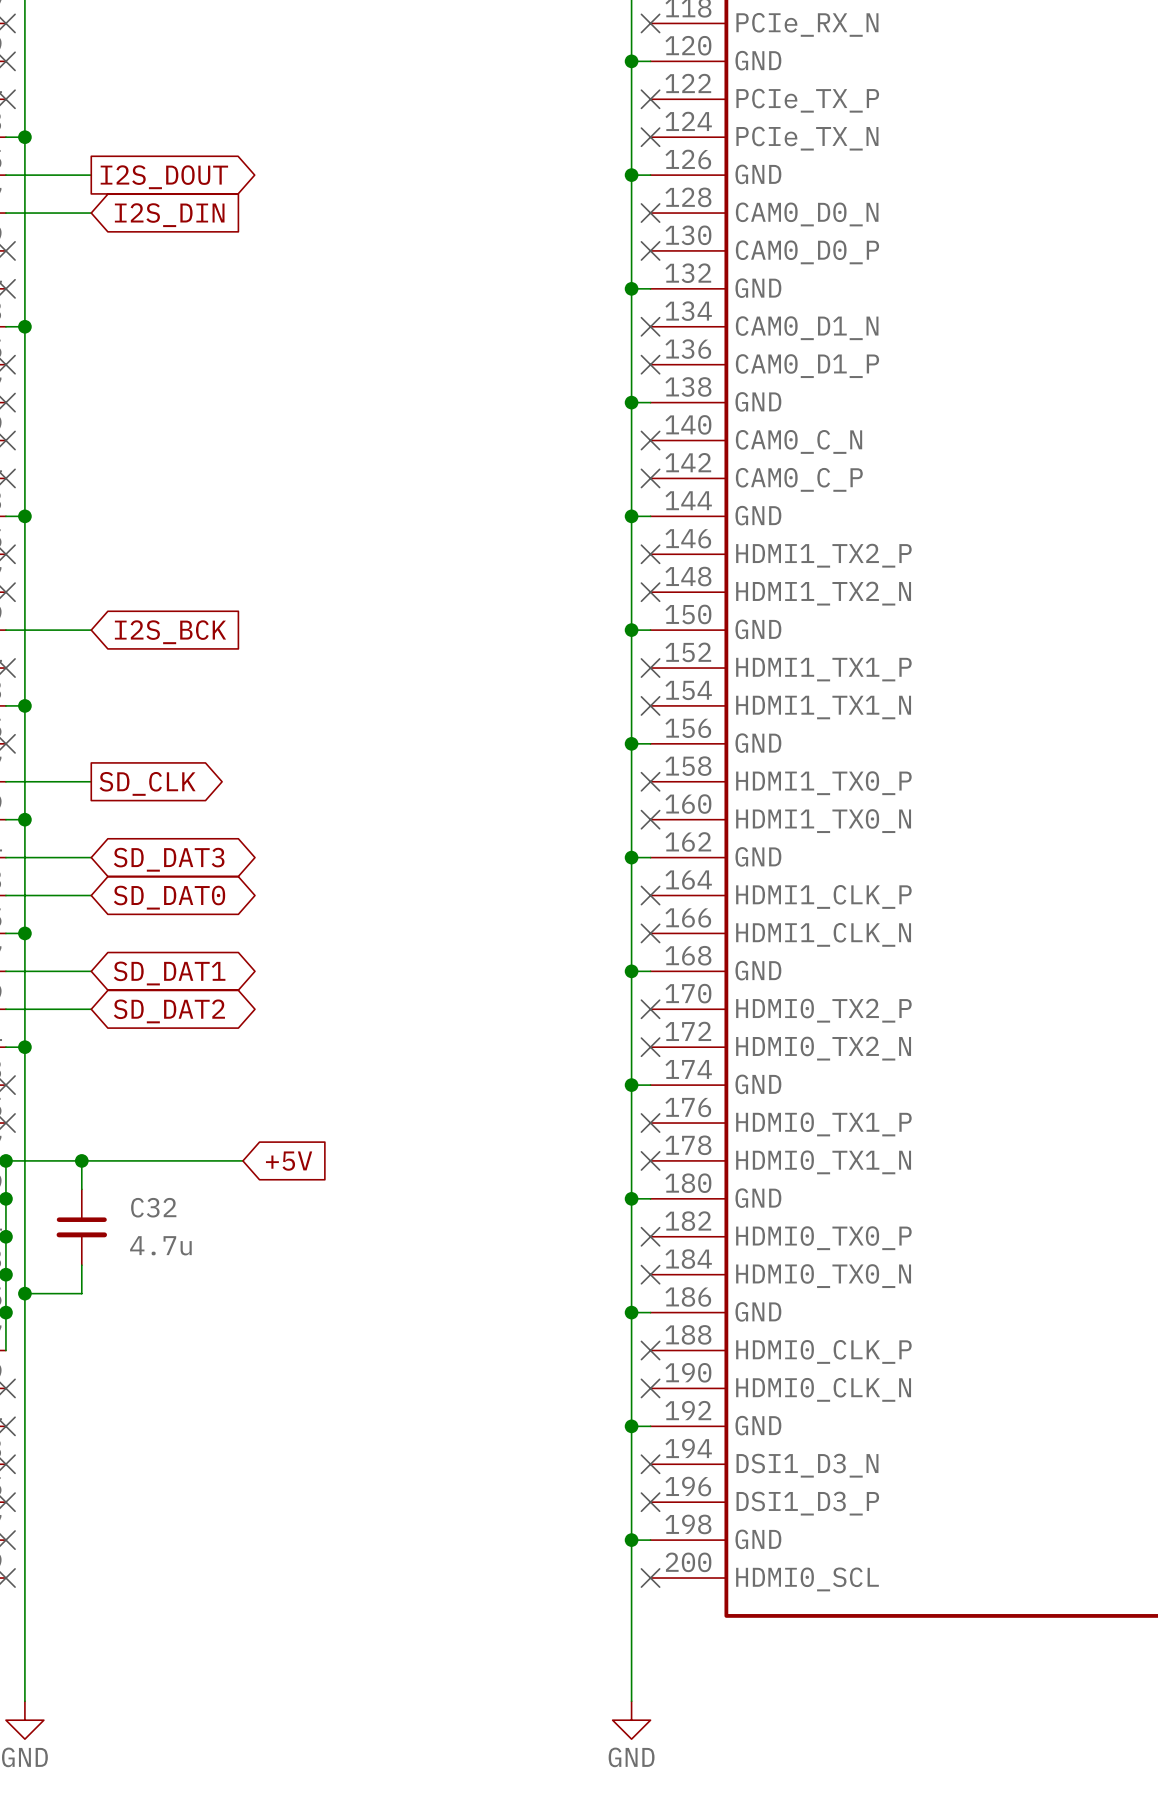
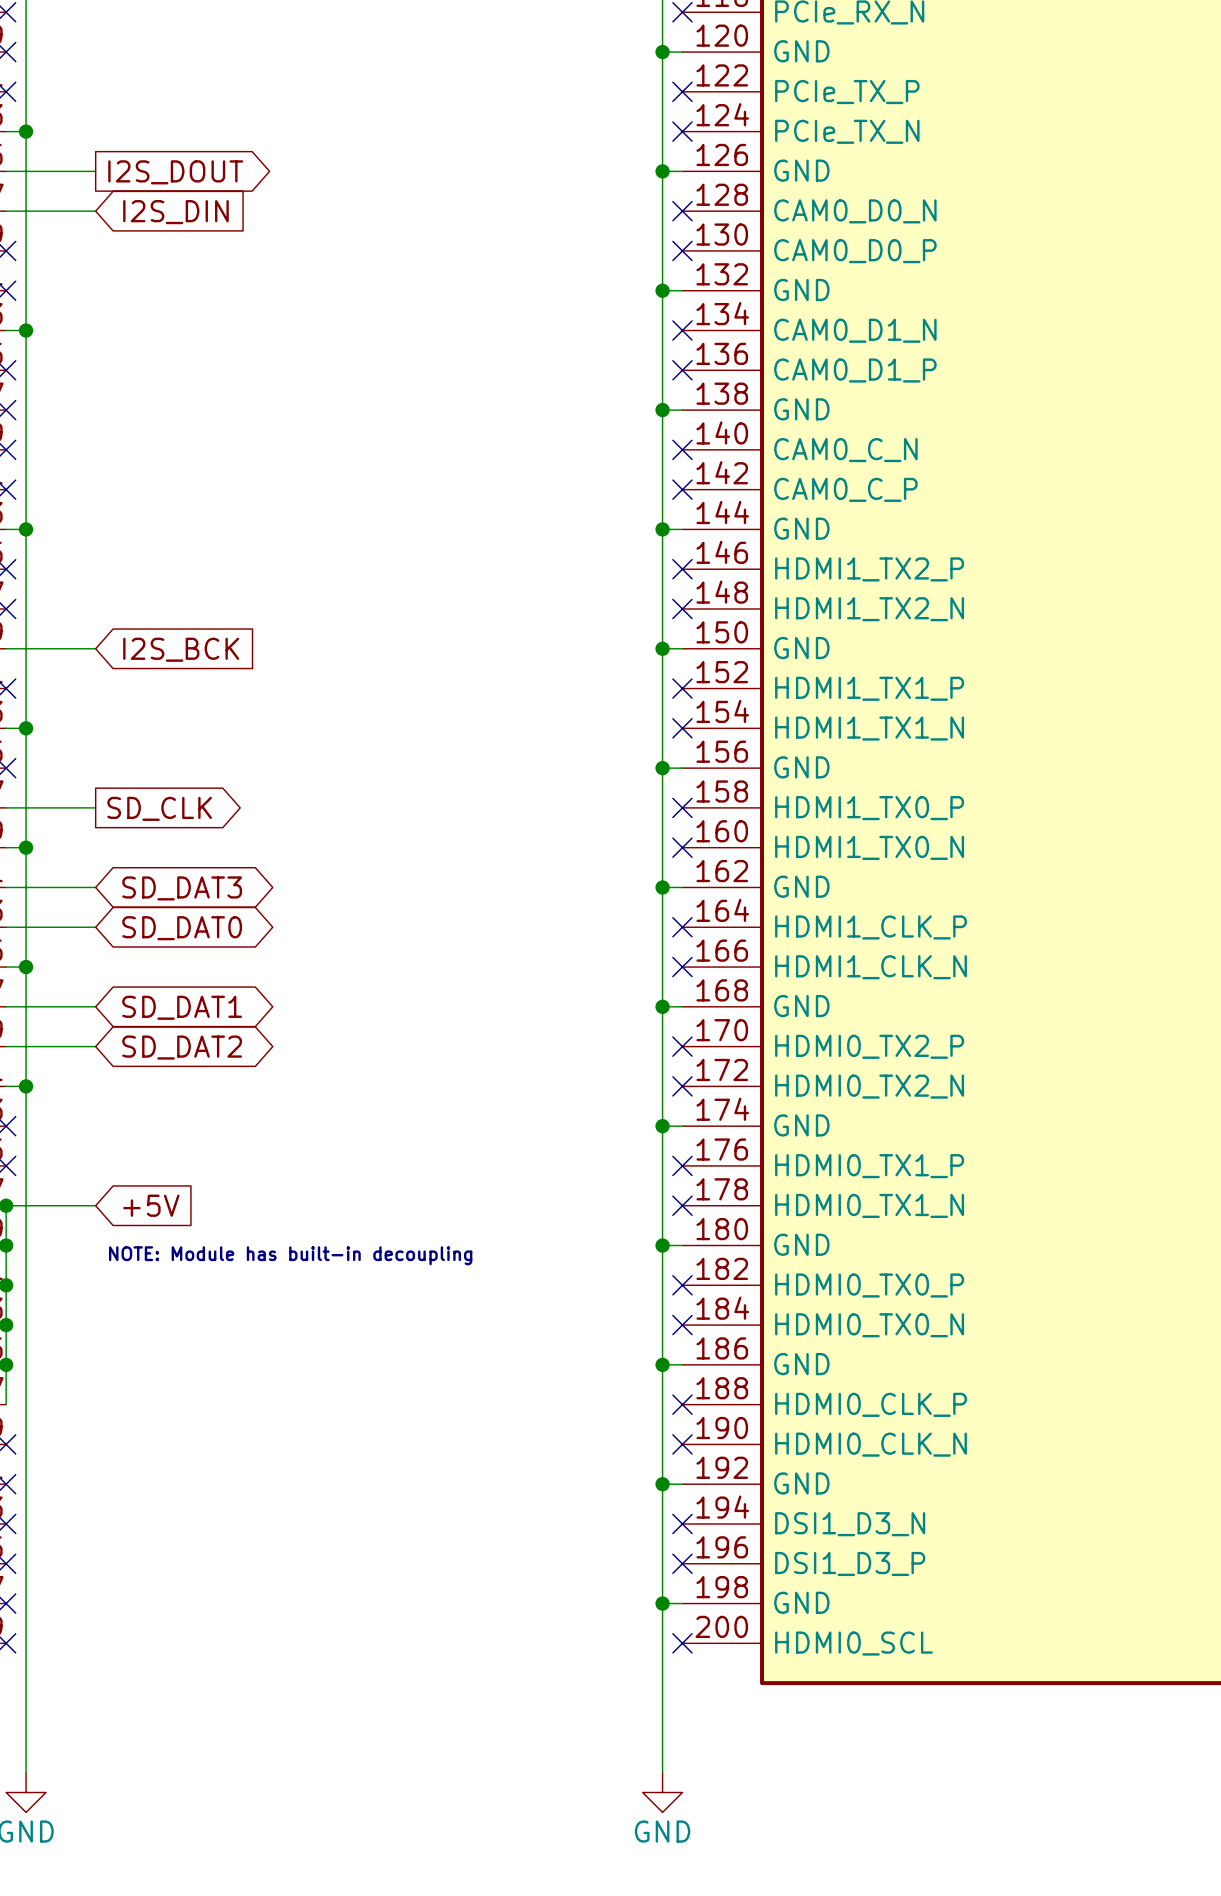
wire: (81, 1160) (81, 1189) -> none
junction: (81, 1160) -> none
wire: (91, 1160) (242, 1160) -> none
global label position: +5V (289, 1161) -> +5V (151, 1205)
text: none -> NOTE: Module has built-in decoupling (290, 1255)
C32: 4.7u (81, 1227) -> none
wire: (81, 1265) (81, 1293) (24, 1293) -> none
junction: (24, 1293) -> none

